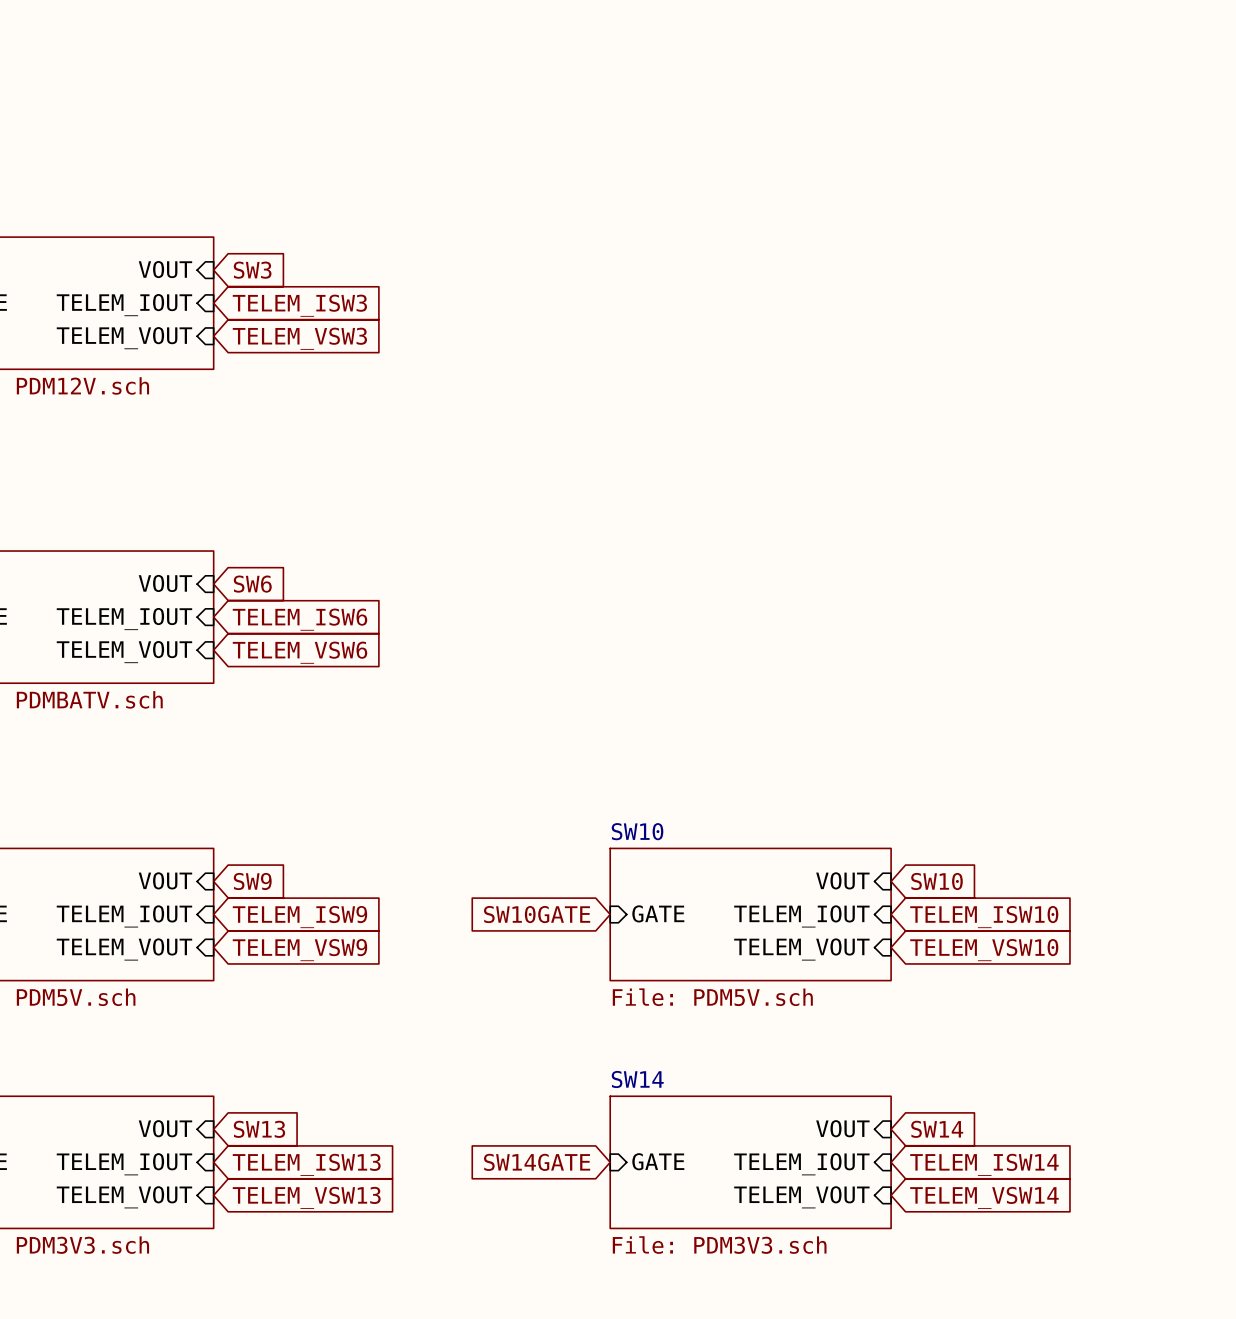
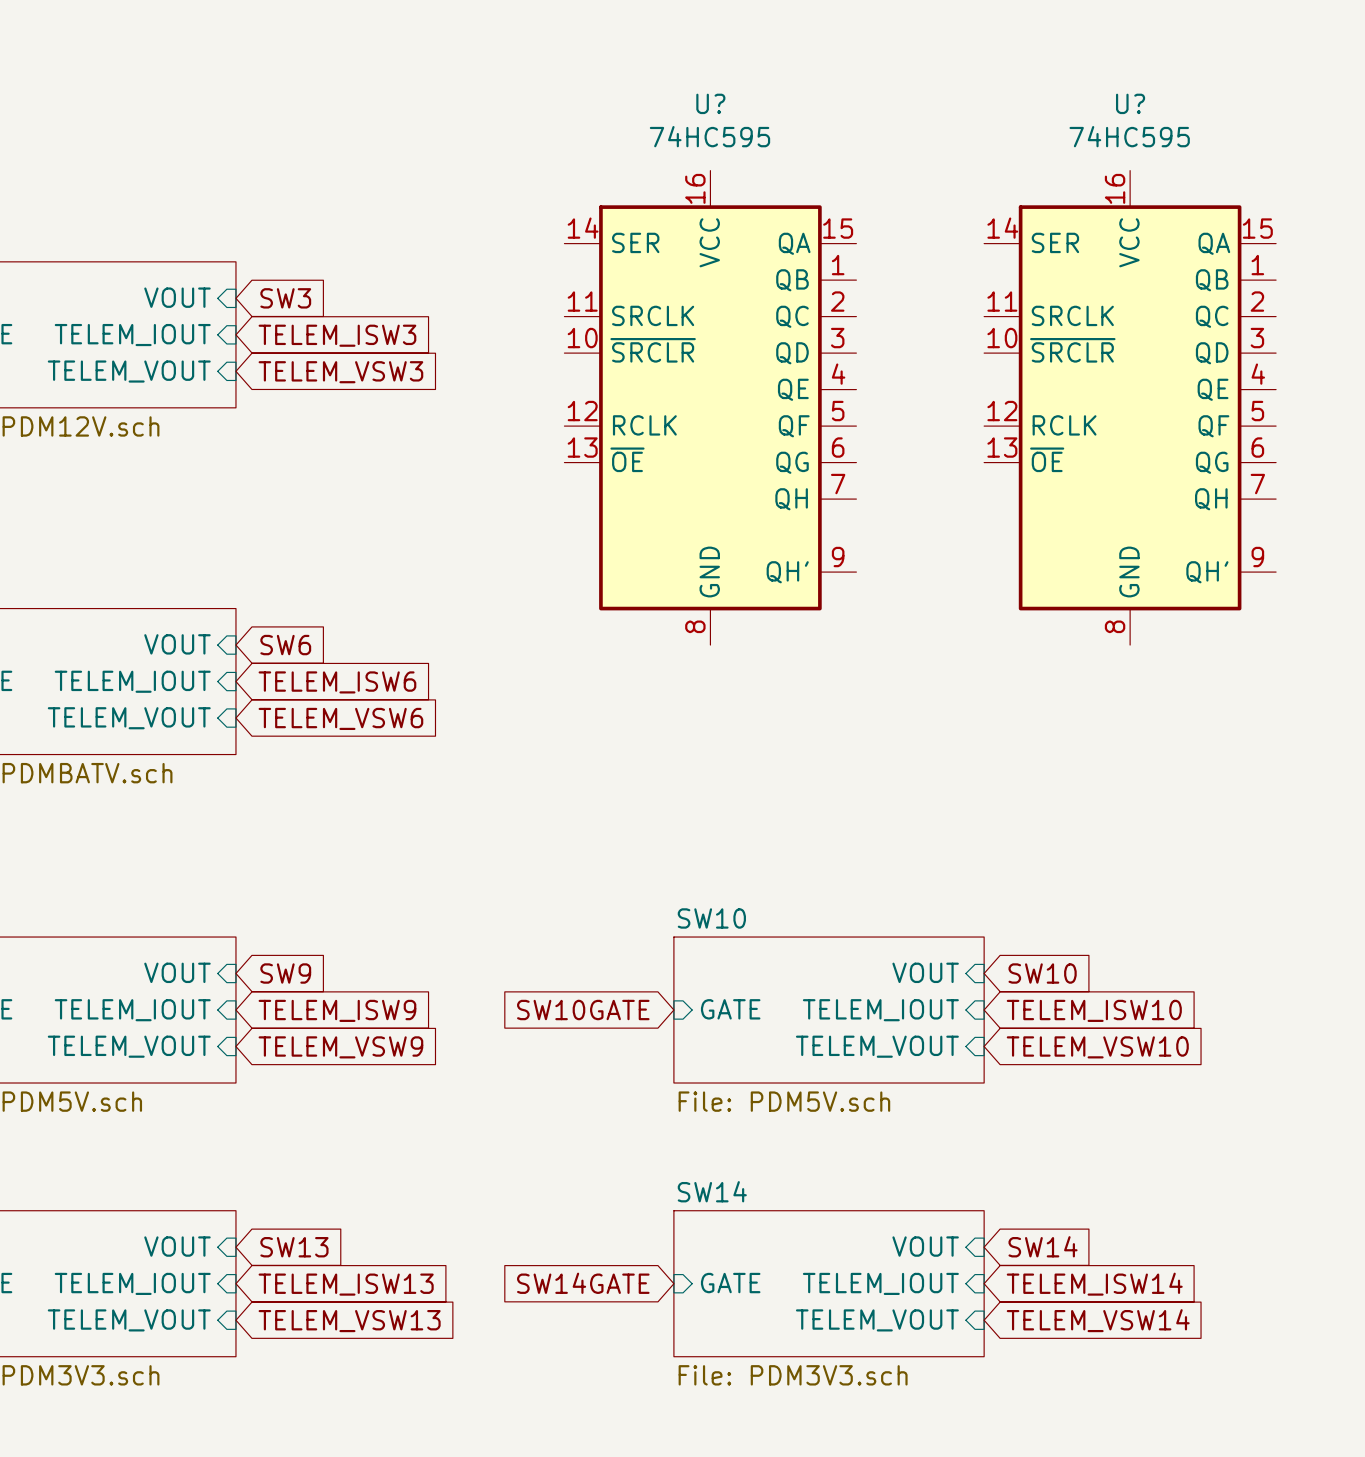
U?: none -> 74HC595 (710, 407)
U?: none -> 74HC595 (1130, 407)

